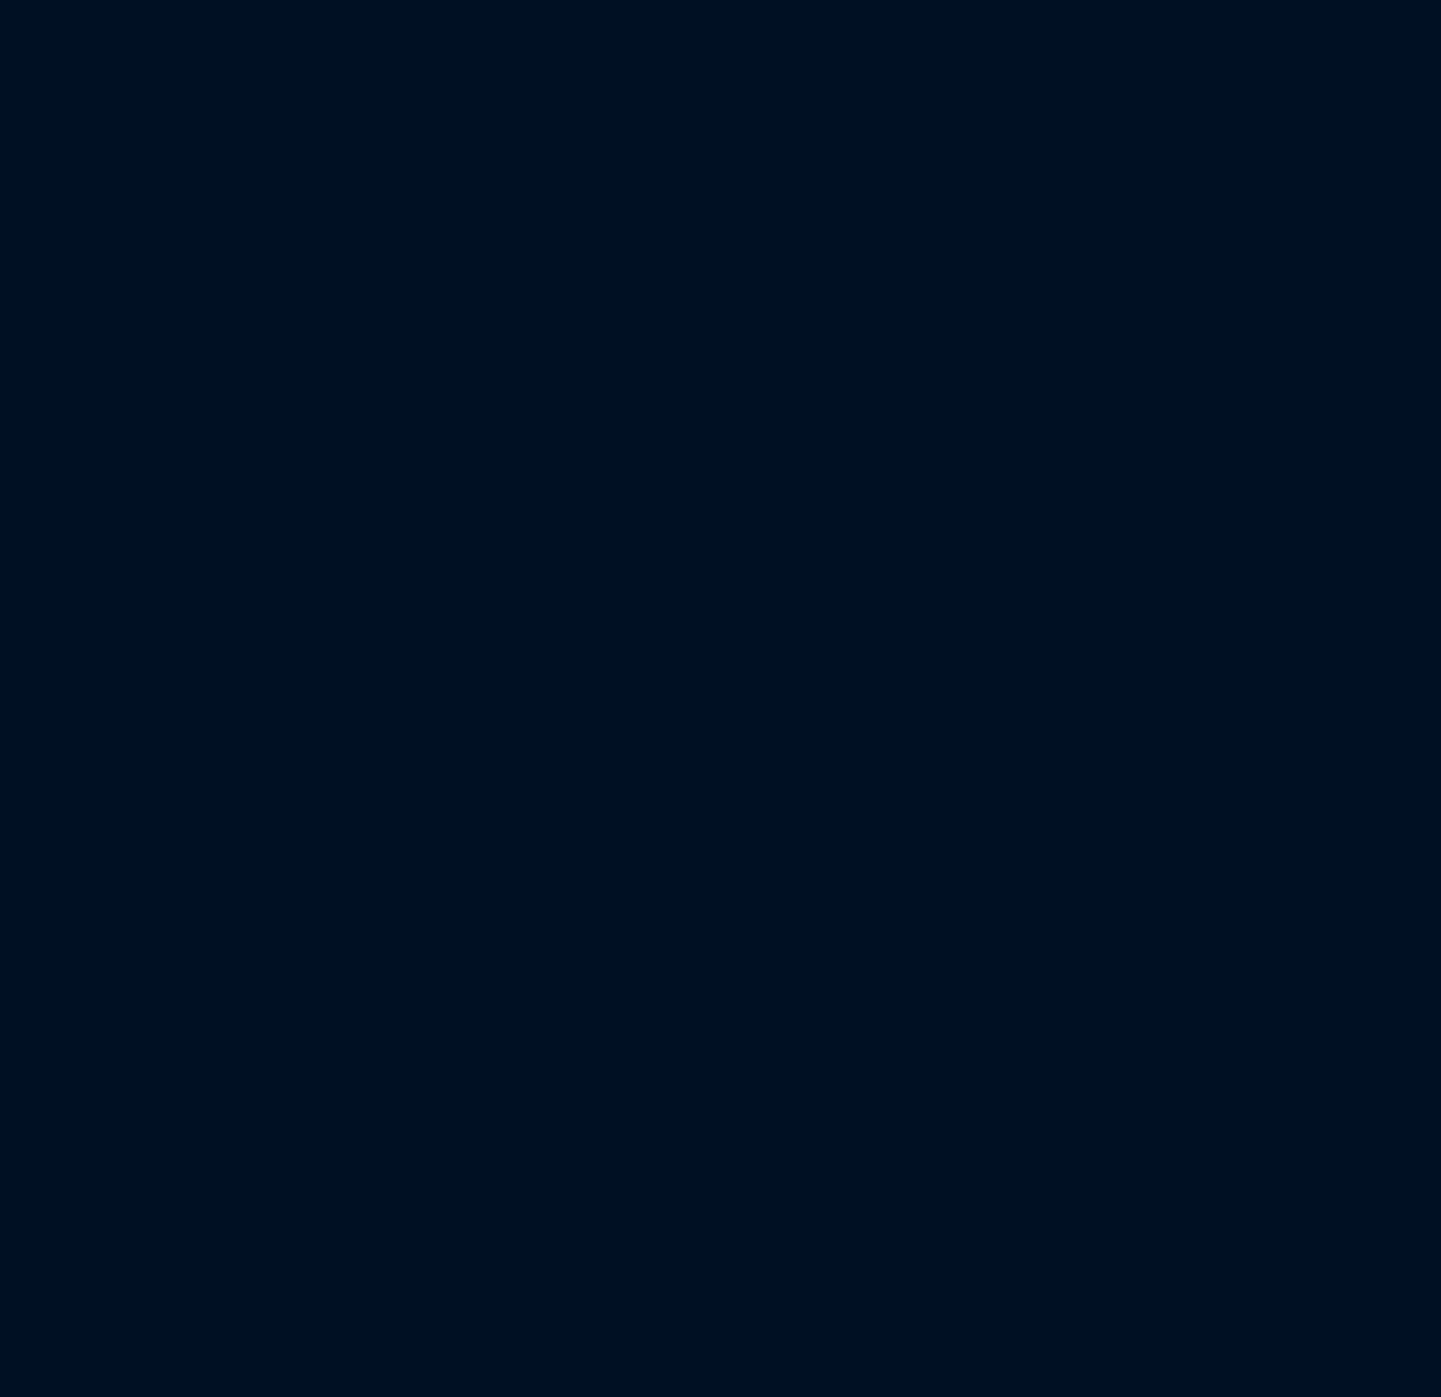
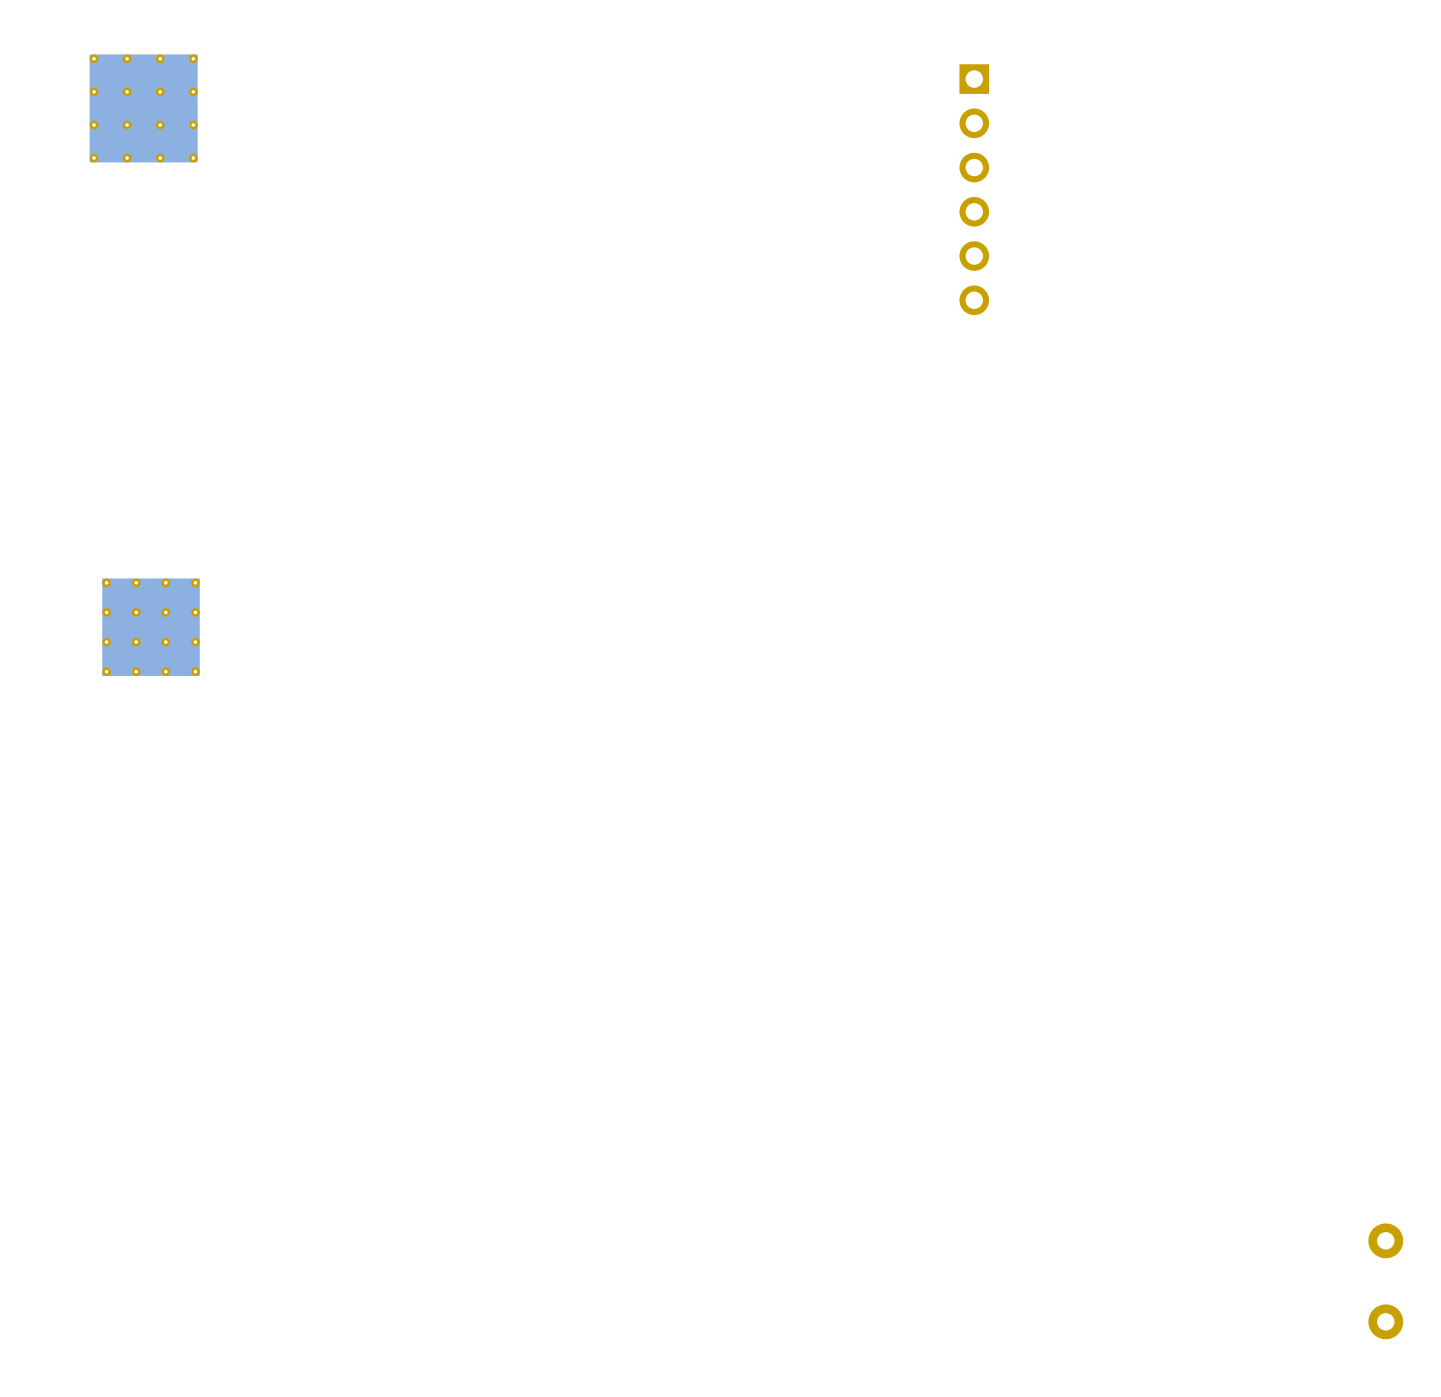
part: none -> (143, 108)
part: none -> (974, 189)
part: none -> (151, 627)
part: none -> (1385, 1240)
part: none -> (1385, 1321)

